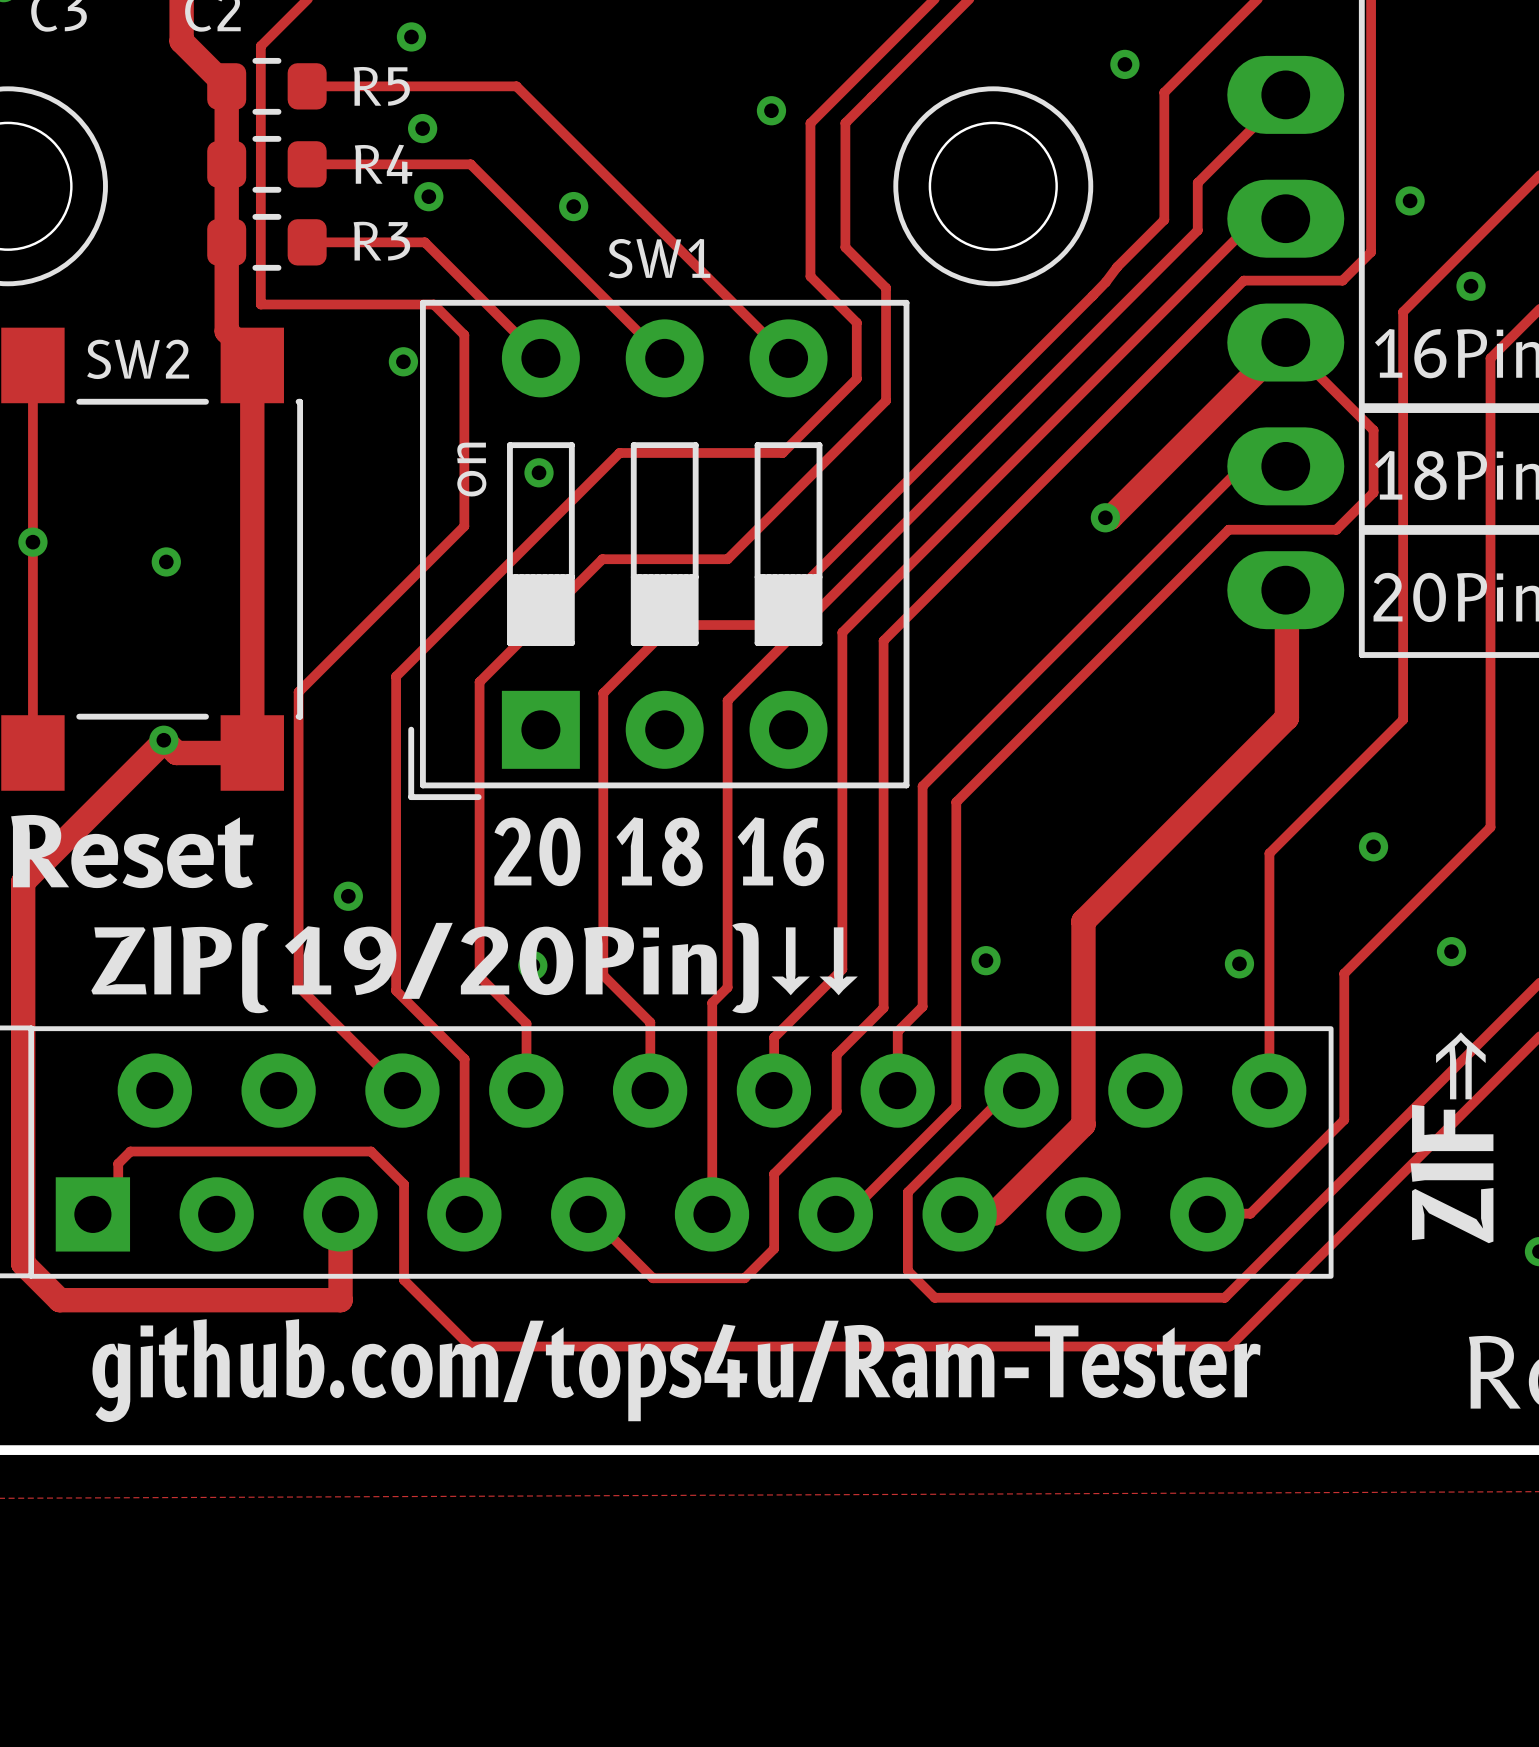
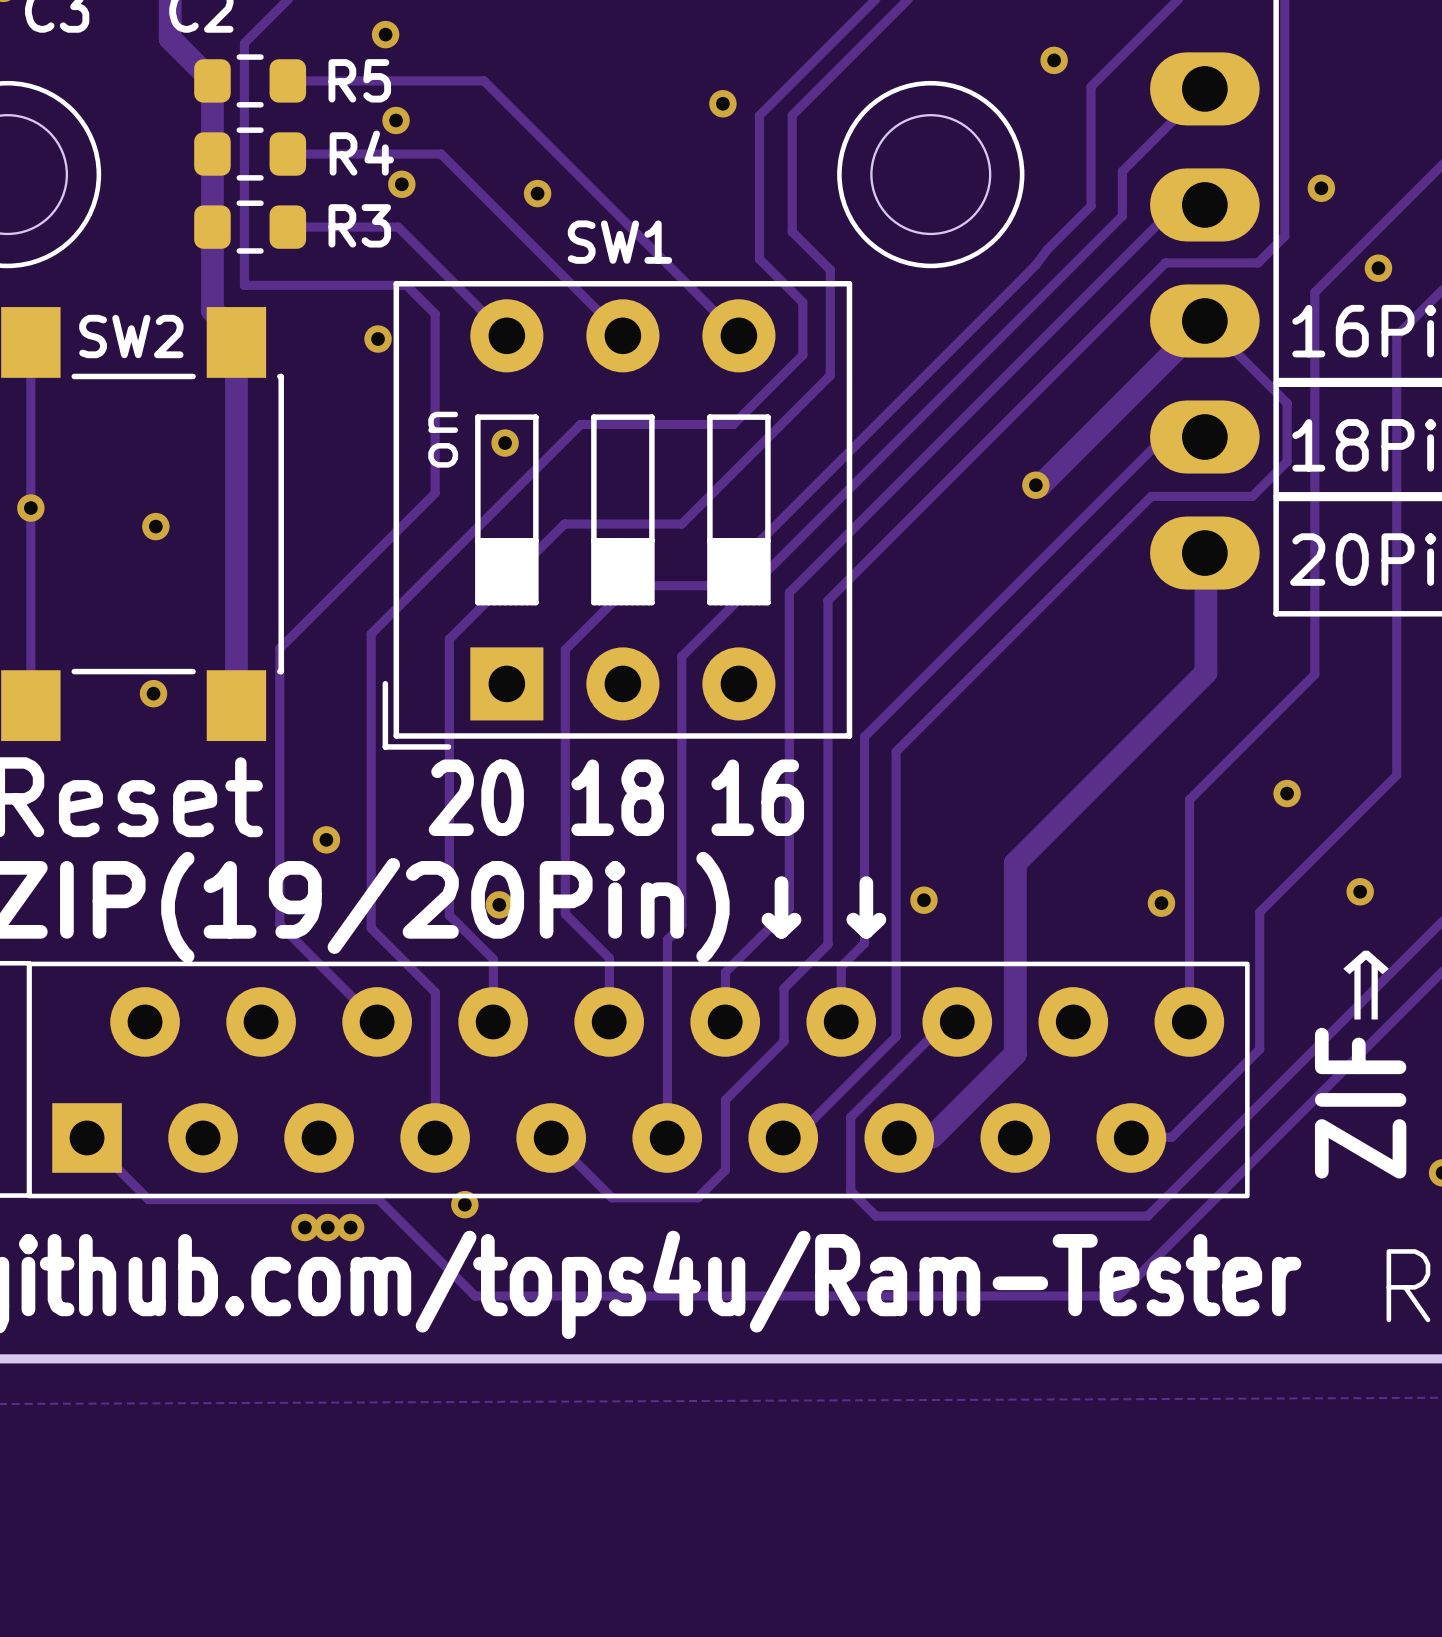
track: (163, 740) (176, 752) (252, 752) -> none
track: (163, 741) (23, 882) (23, 1263) (59, 1300) (340, 1300) (340, 1214) -> none
track: (118, 1188) (118, 1163) (130, 1151) (371, 1151) (404, 1184) (404, 1280) -> (87, 1137) (148, 1199) (378, 1199)
via: none -> (464, 1204)
via: none -> (304, 1227)
via: none -> (327, 1227)
via: none -> (350, 1227)
track: (470, 1346) (1229, 1346) -> (440, 1261) (475, 1296) (1118, 1296) (1152, 1261)

